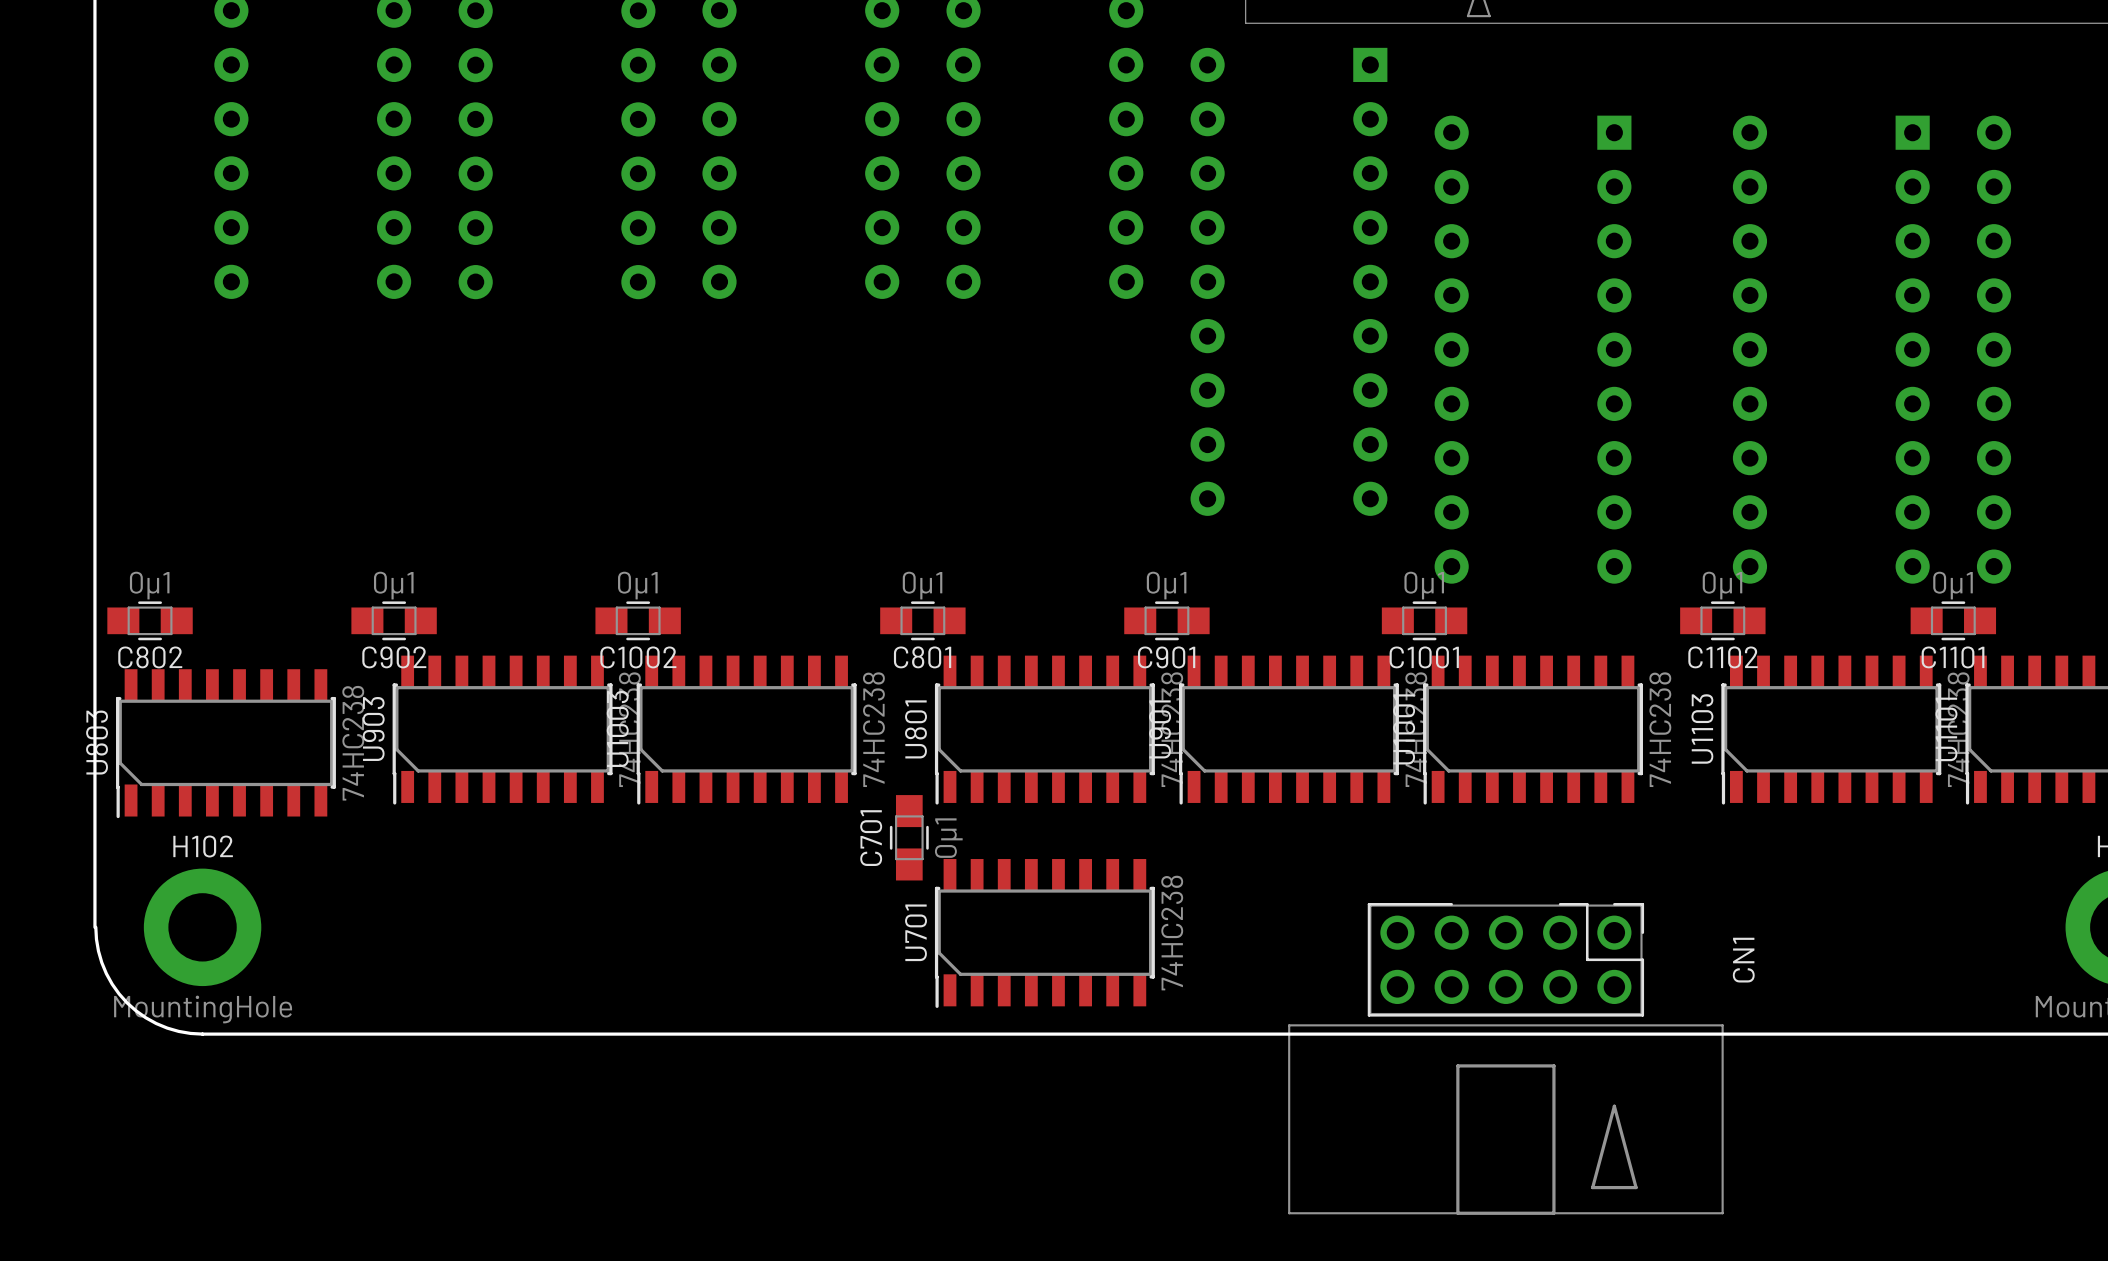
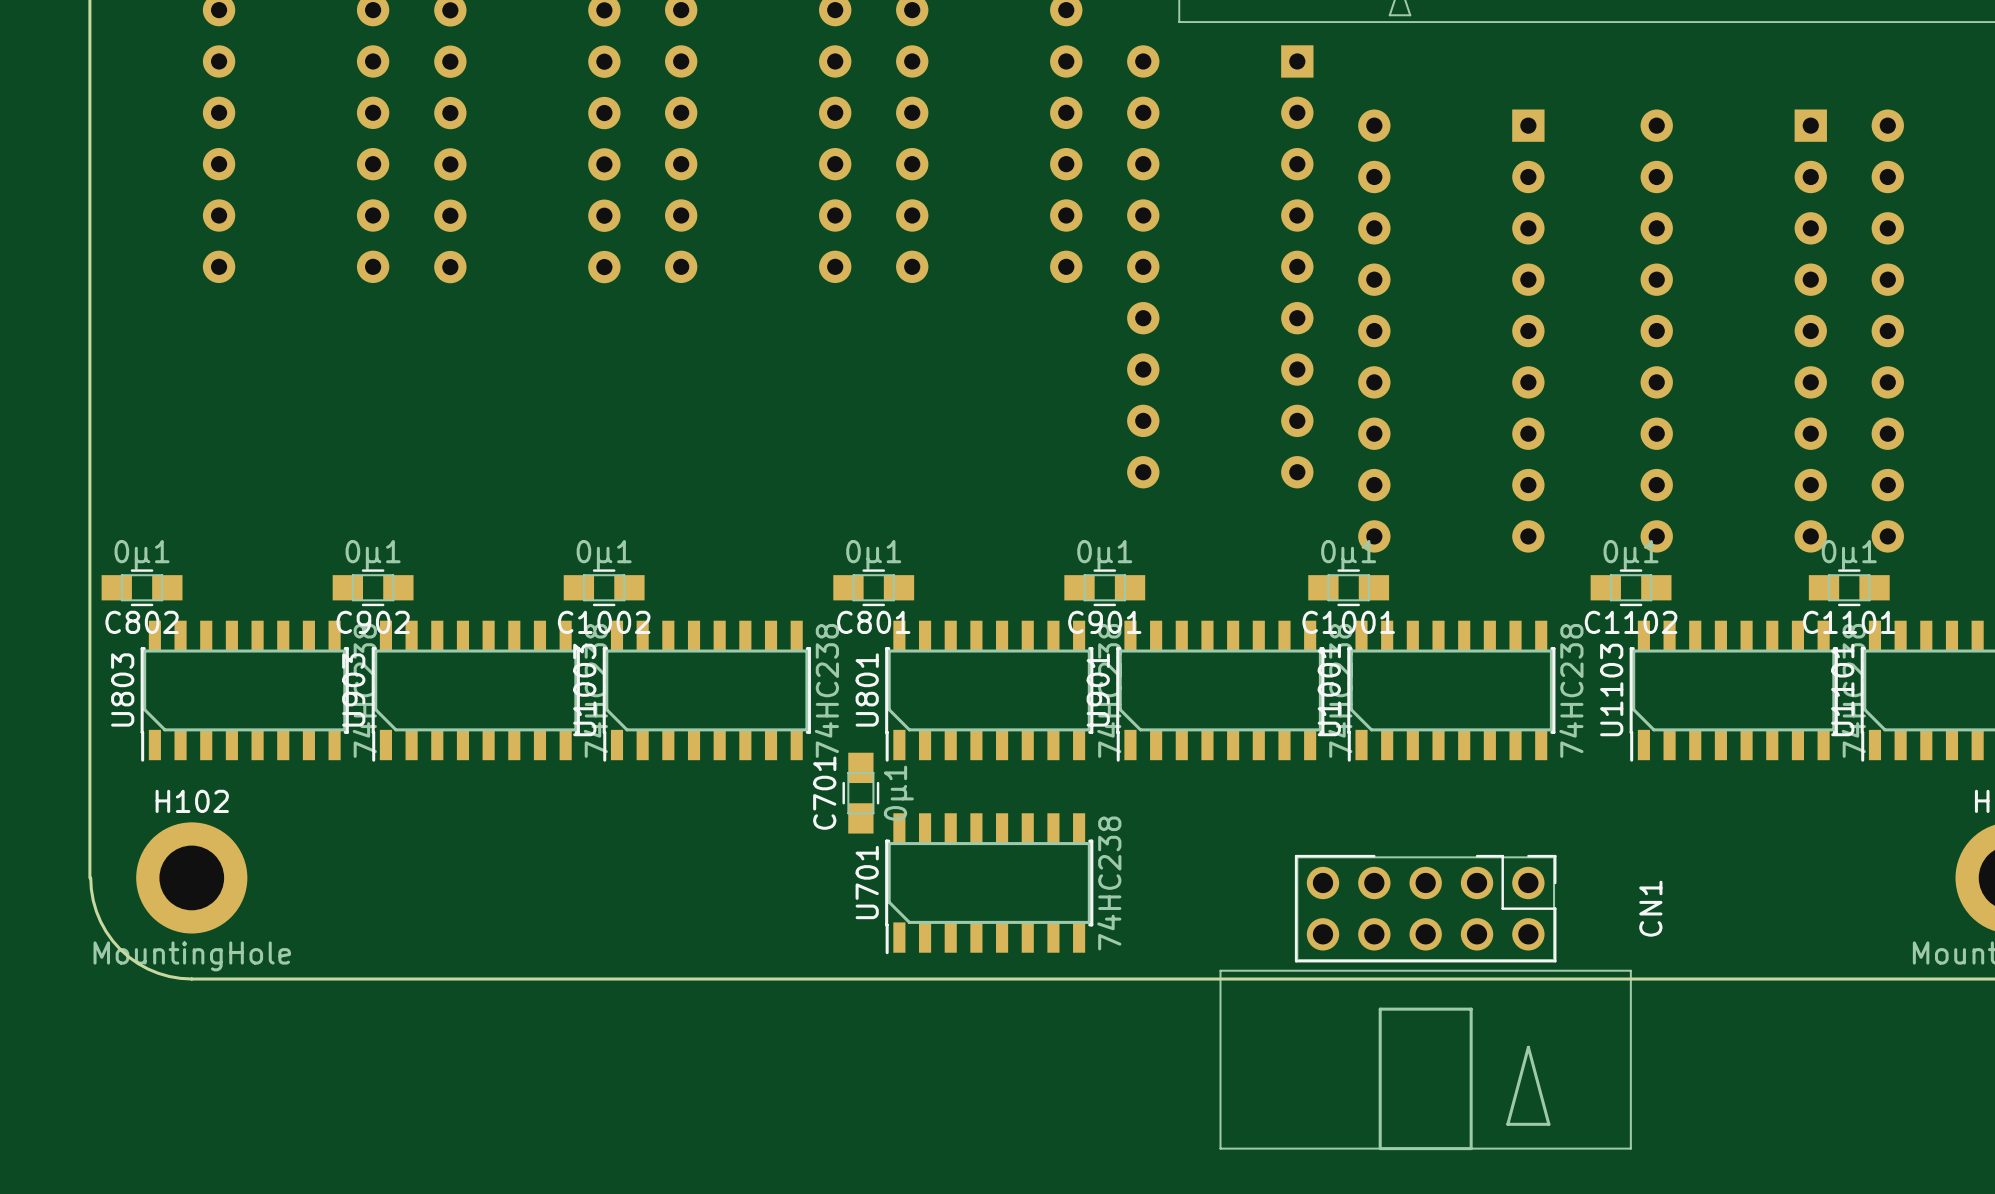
U803 position: (225, 743) -> (244, 691)

